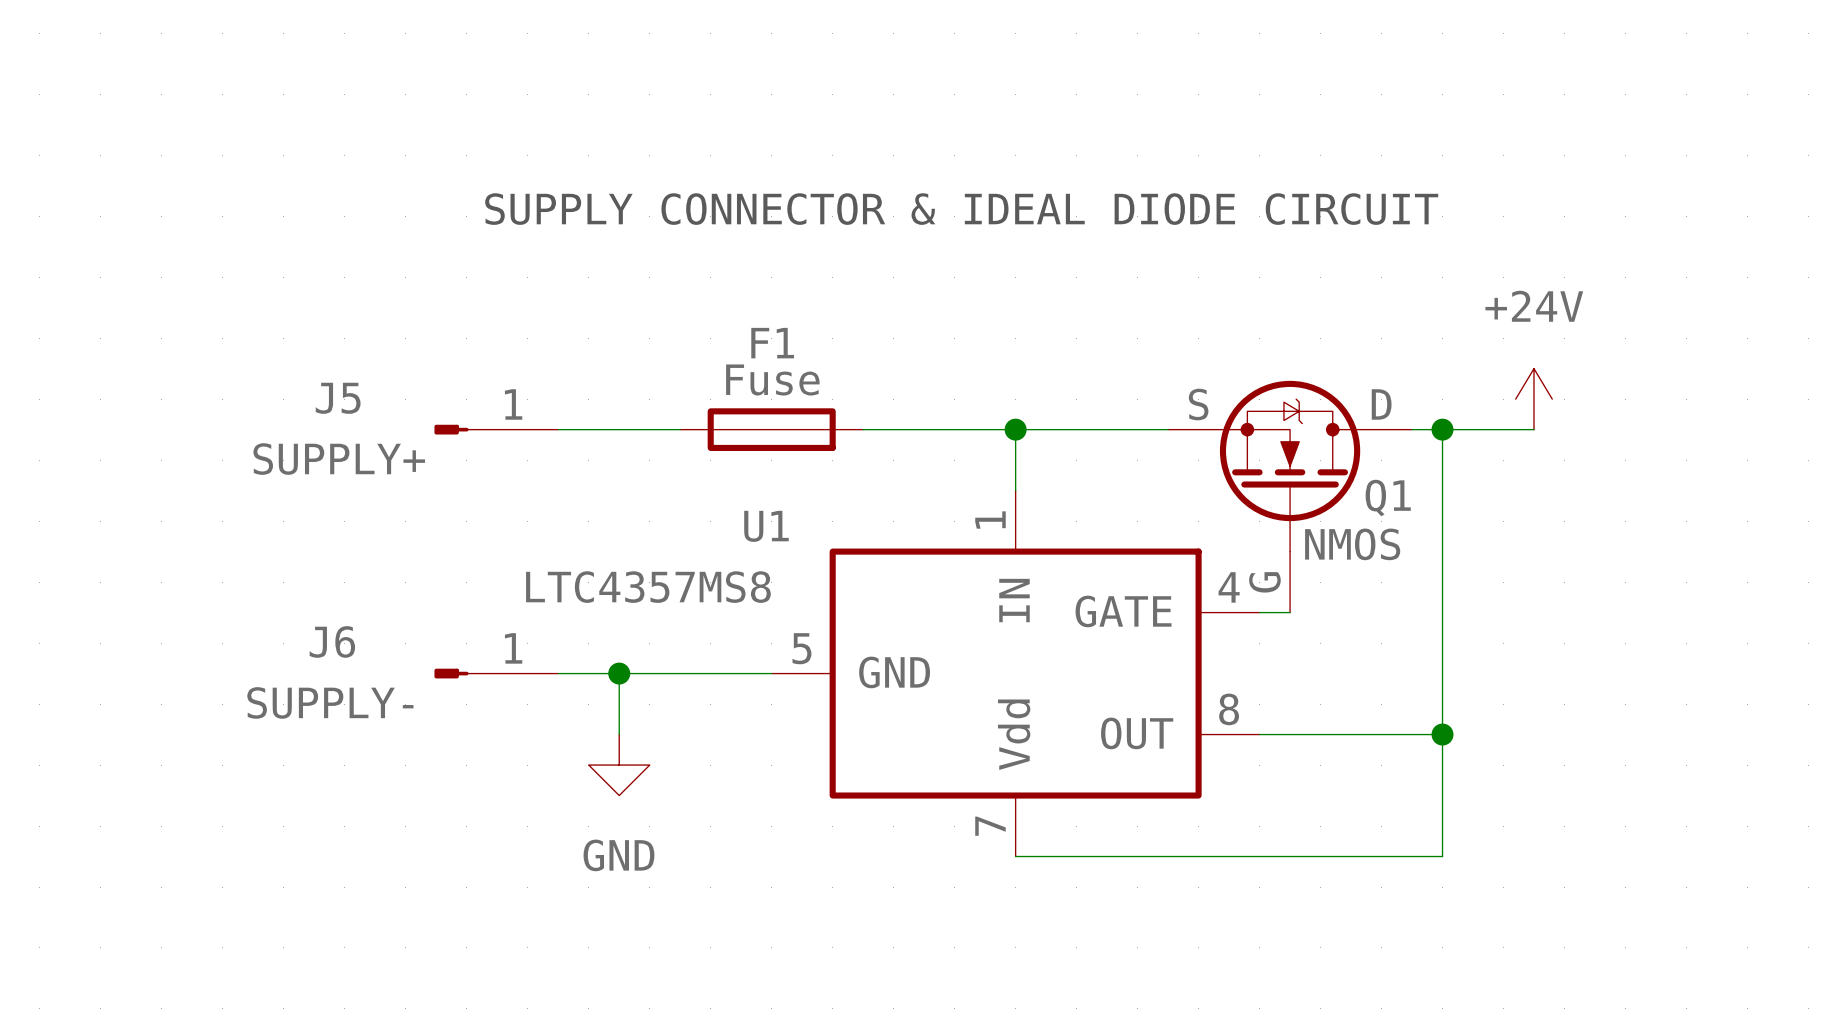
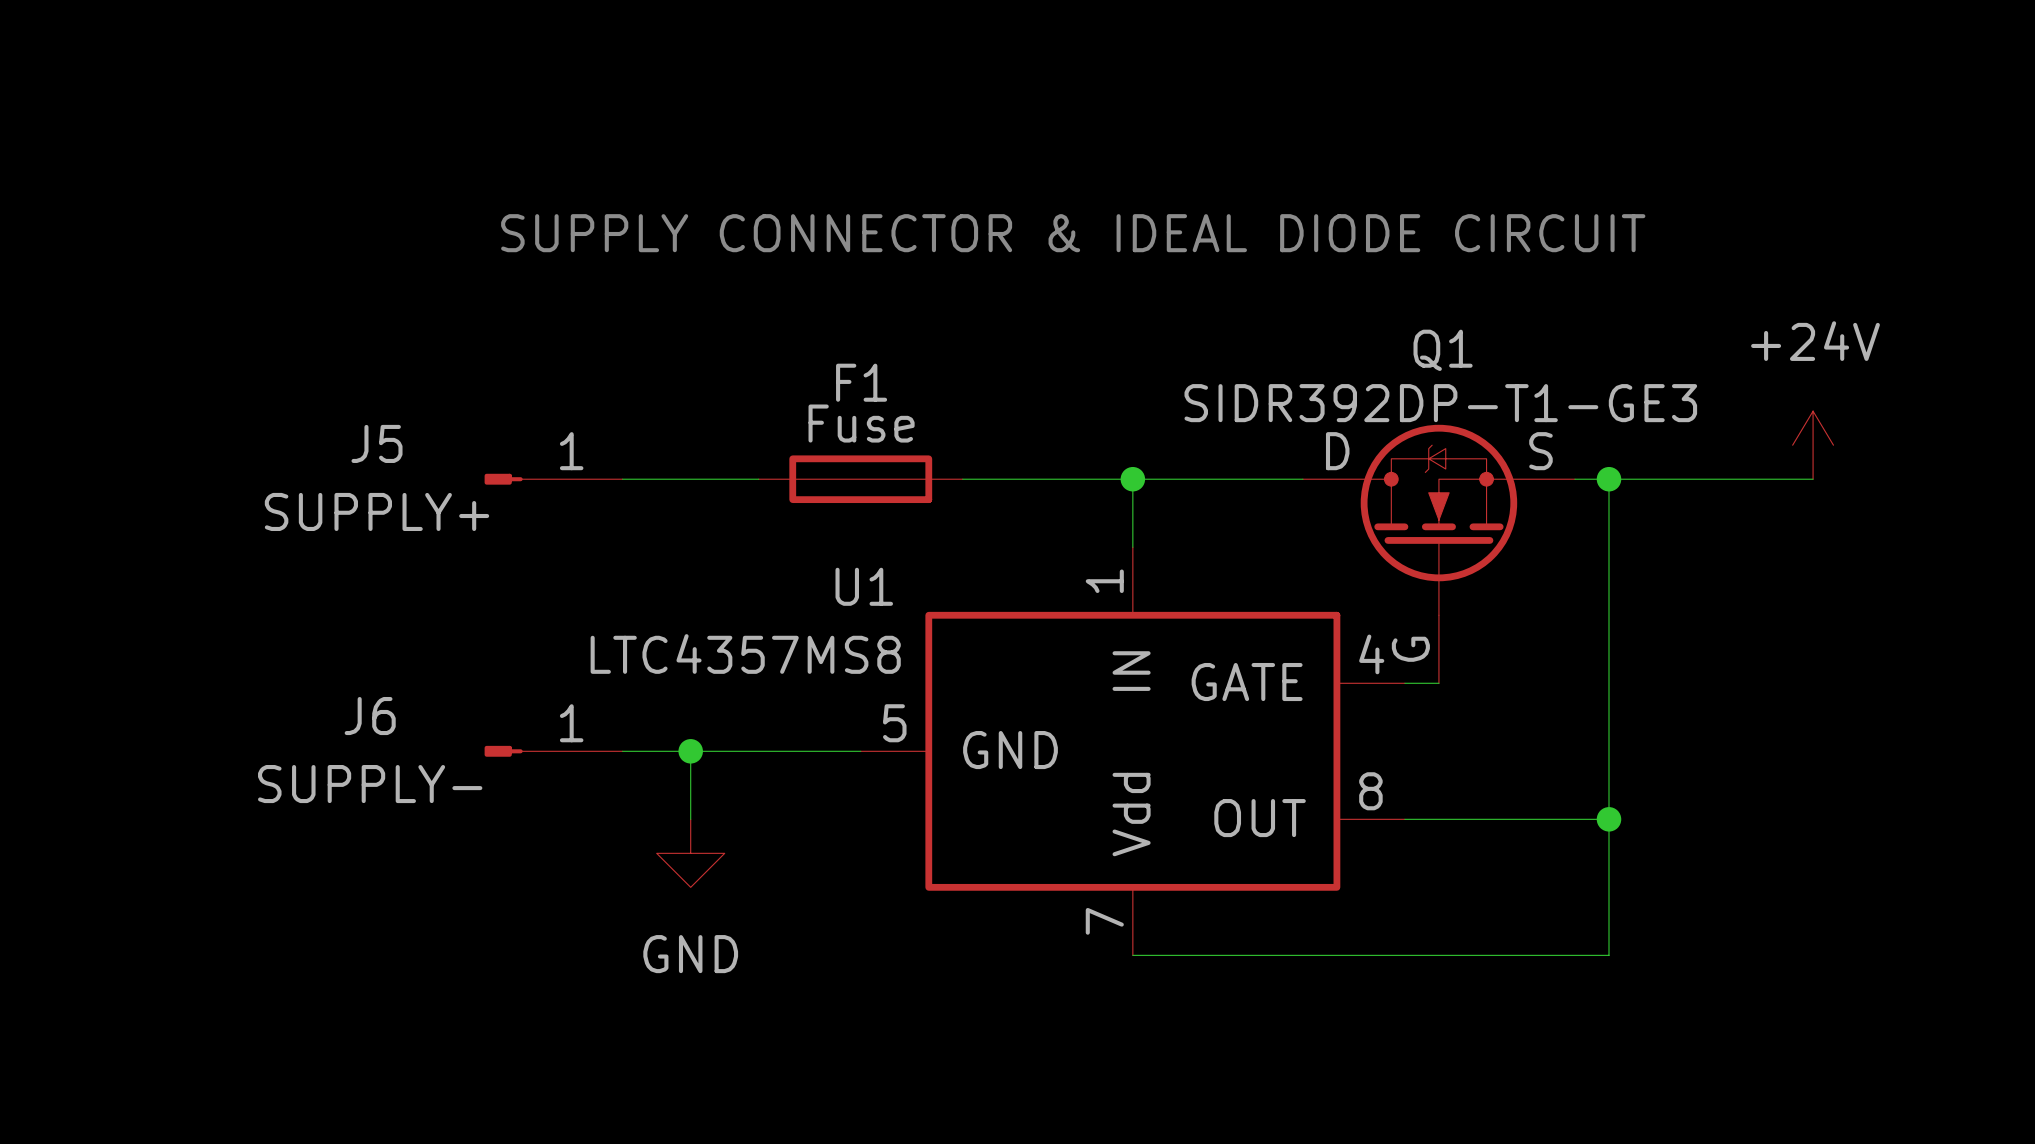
power symbol position: +24V (1533, 399) -> +24V (1813, 445)
wire: none -> (1711, 479) (1813, 479)
Q1 flip: as is (1290, 466) -> left-right (1438, 520)
Q1 name position: Q1 (1388, 498) -> Q1 (1443, 350)
Q1 value: NMOS (1352, 544) -> SIDR392DP-T1-GE3 (1440, 403)

